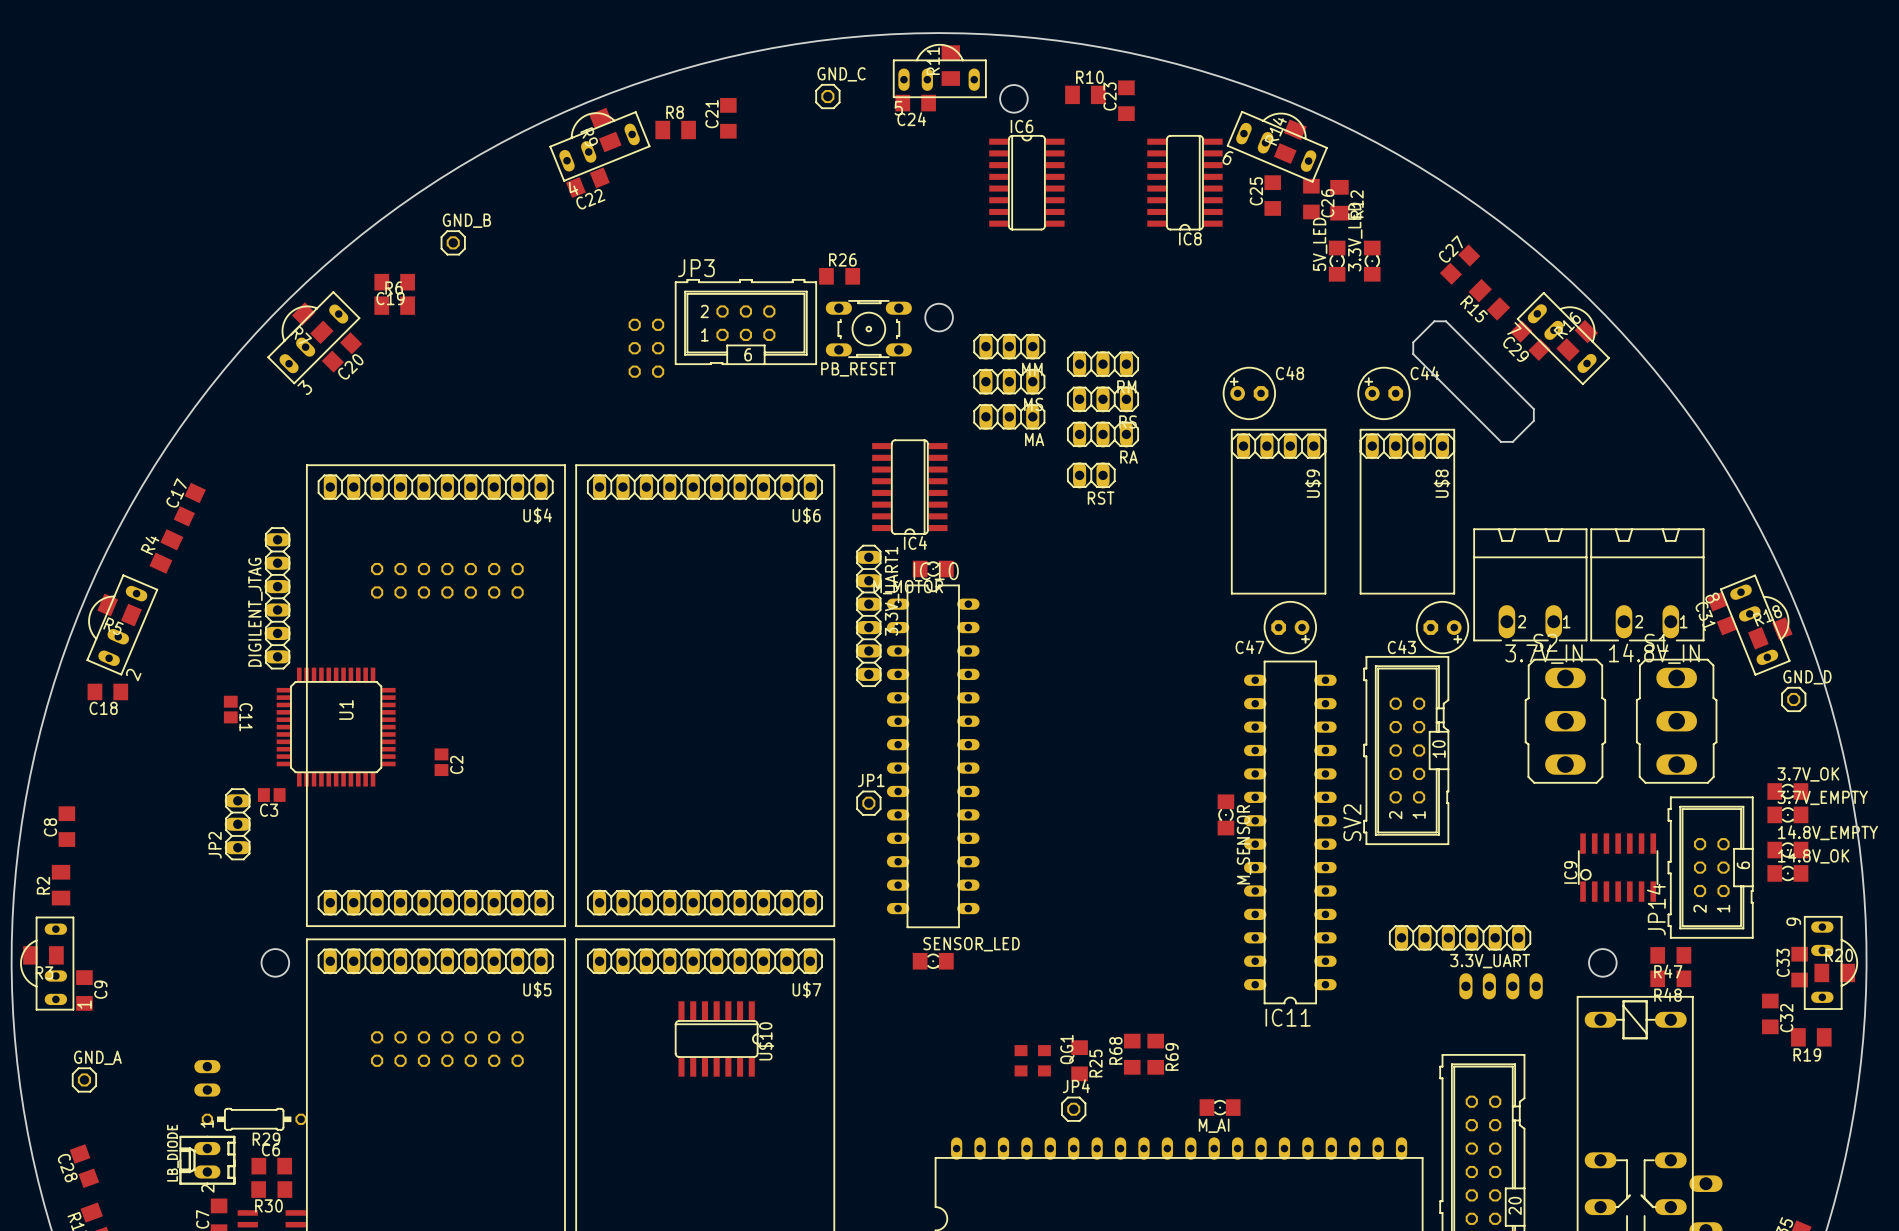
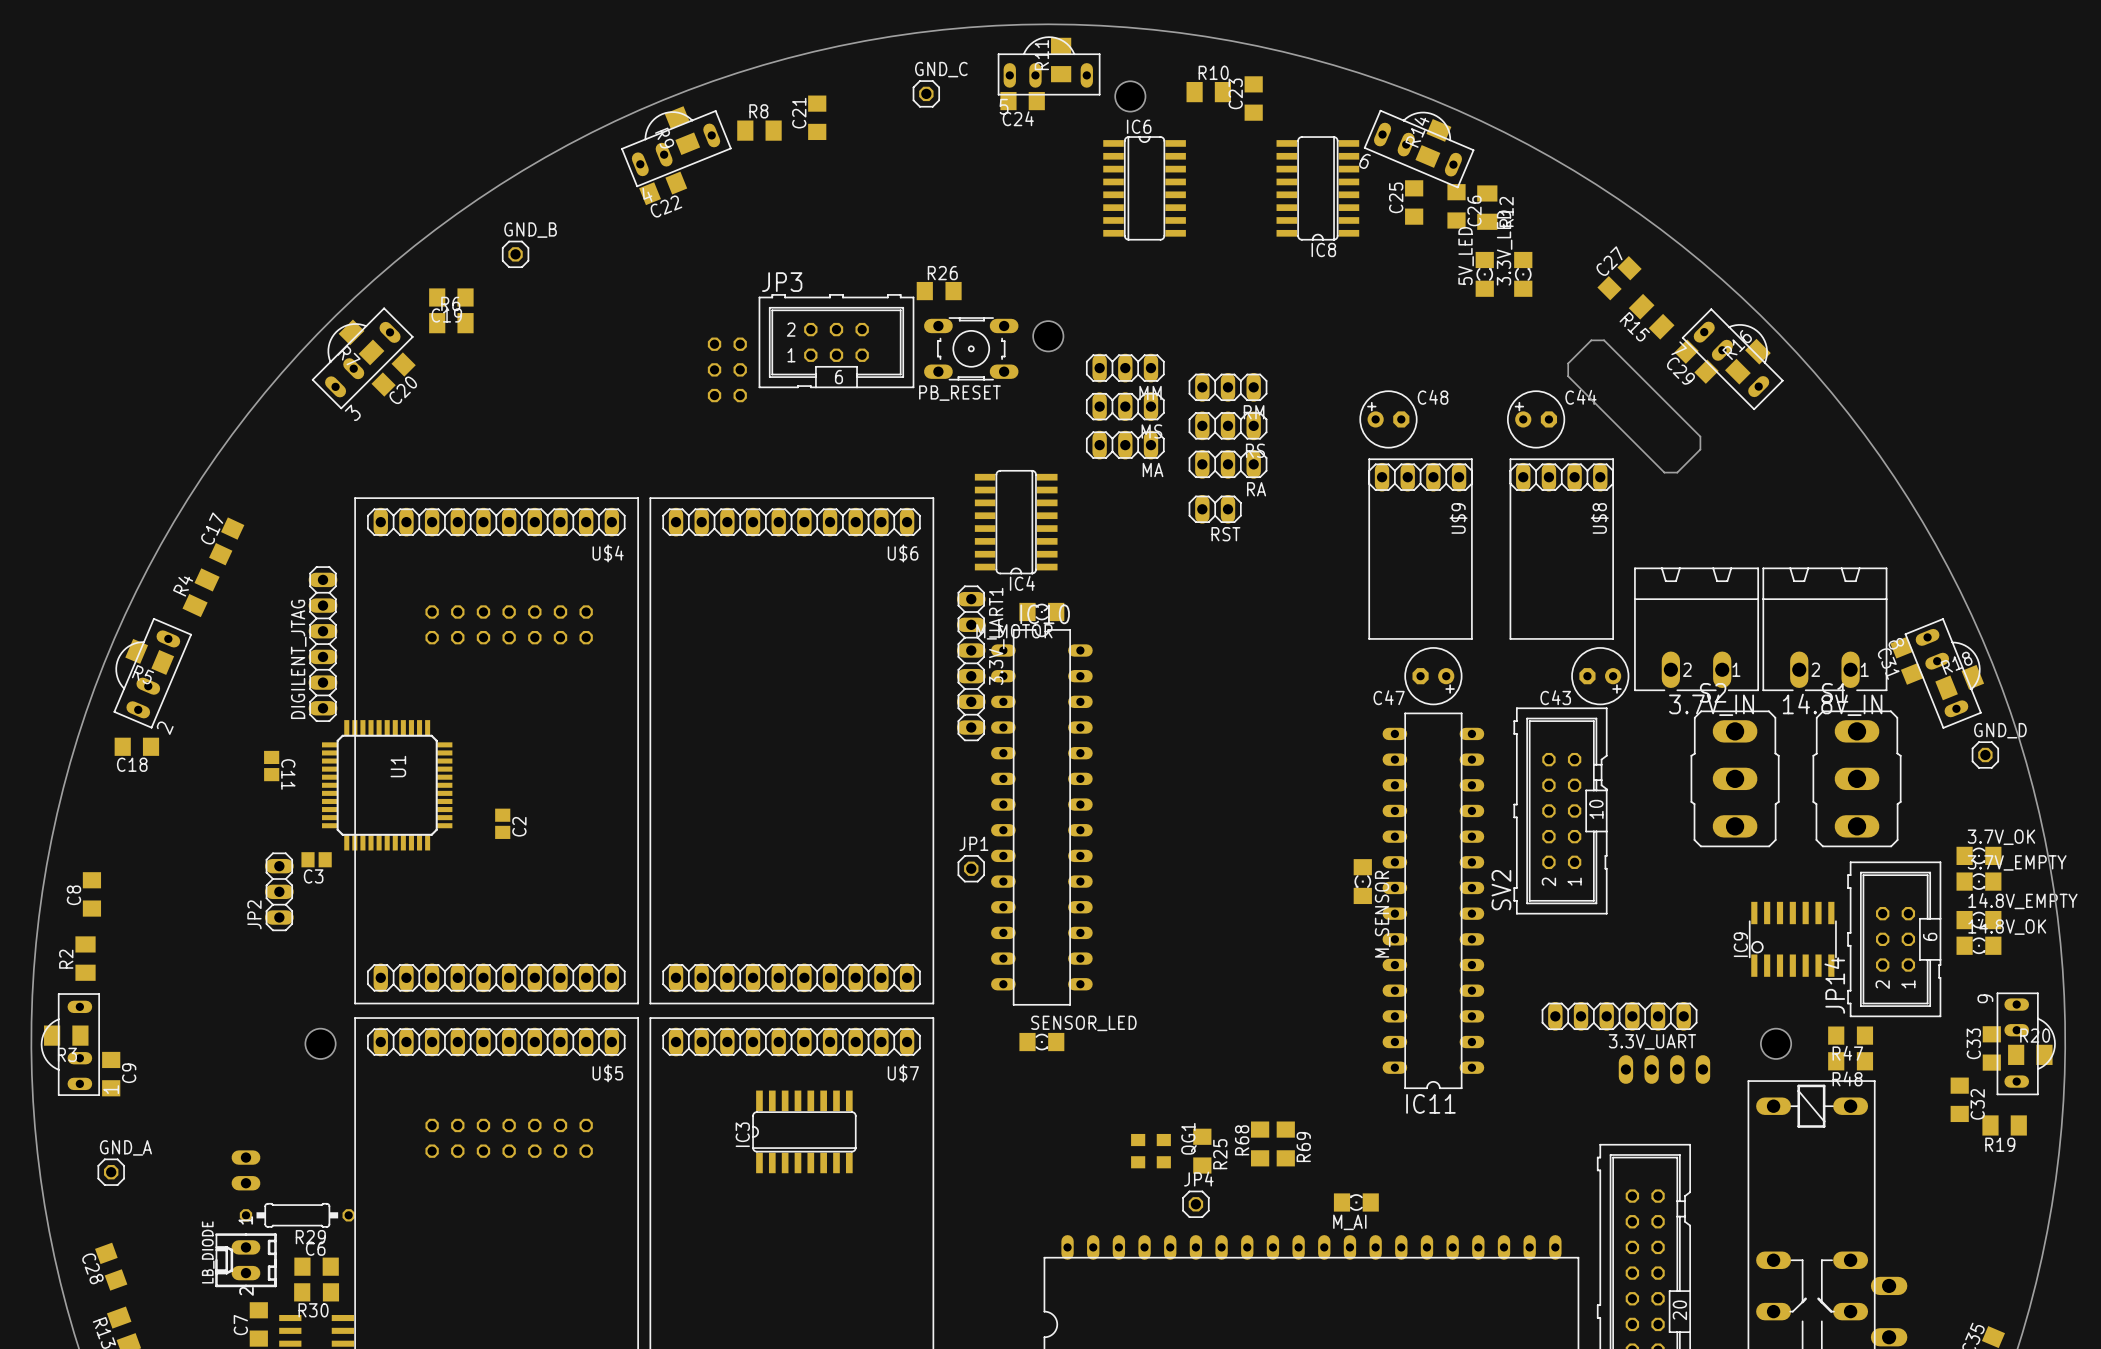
U$10: (716, 1038) -> none
IC3: none -> (804, 1131)

